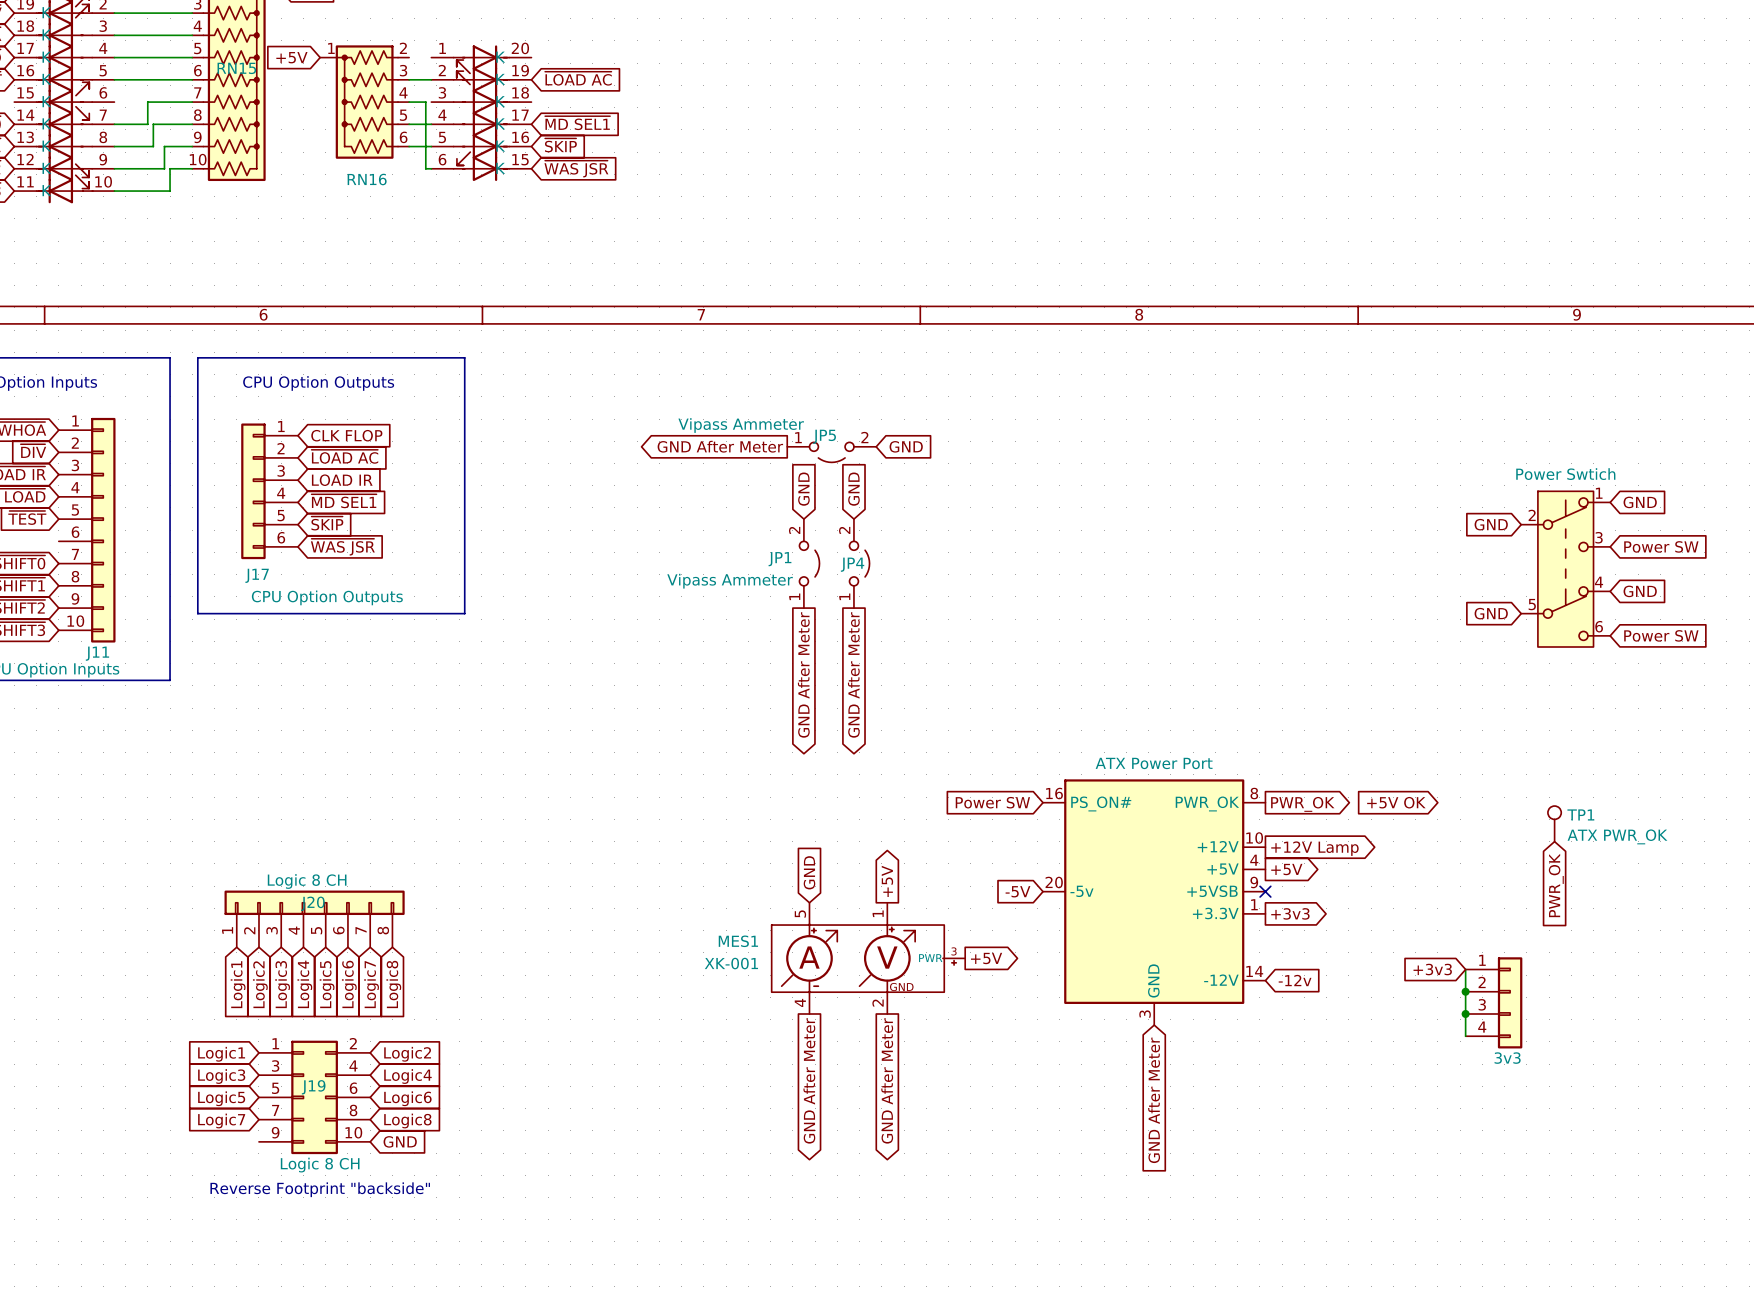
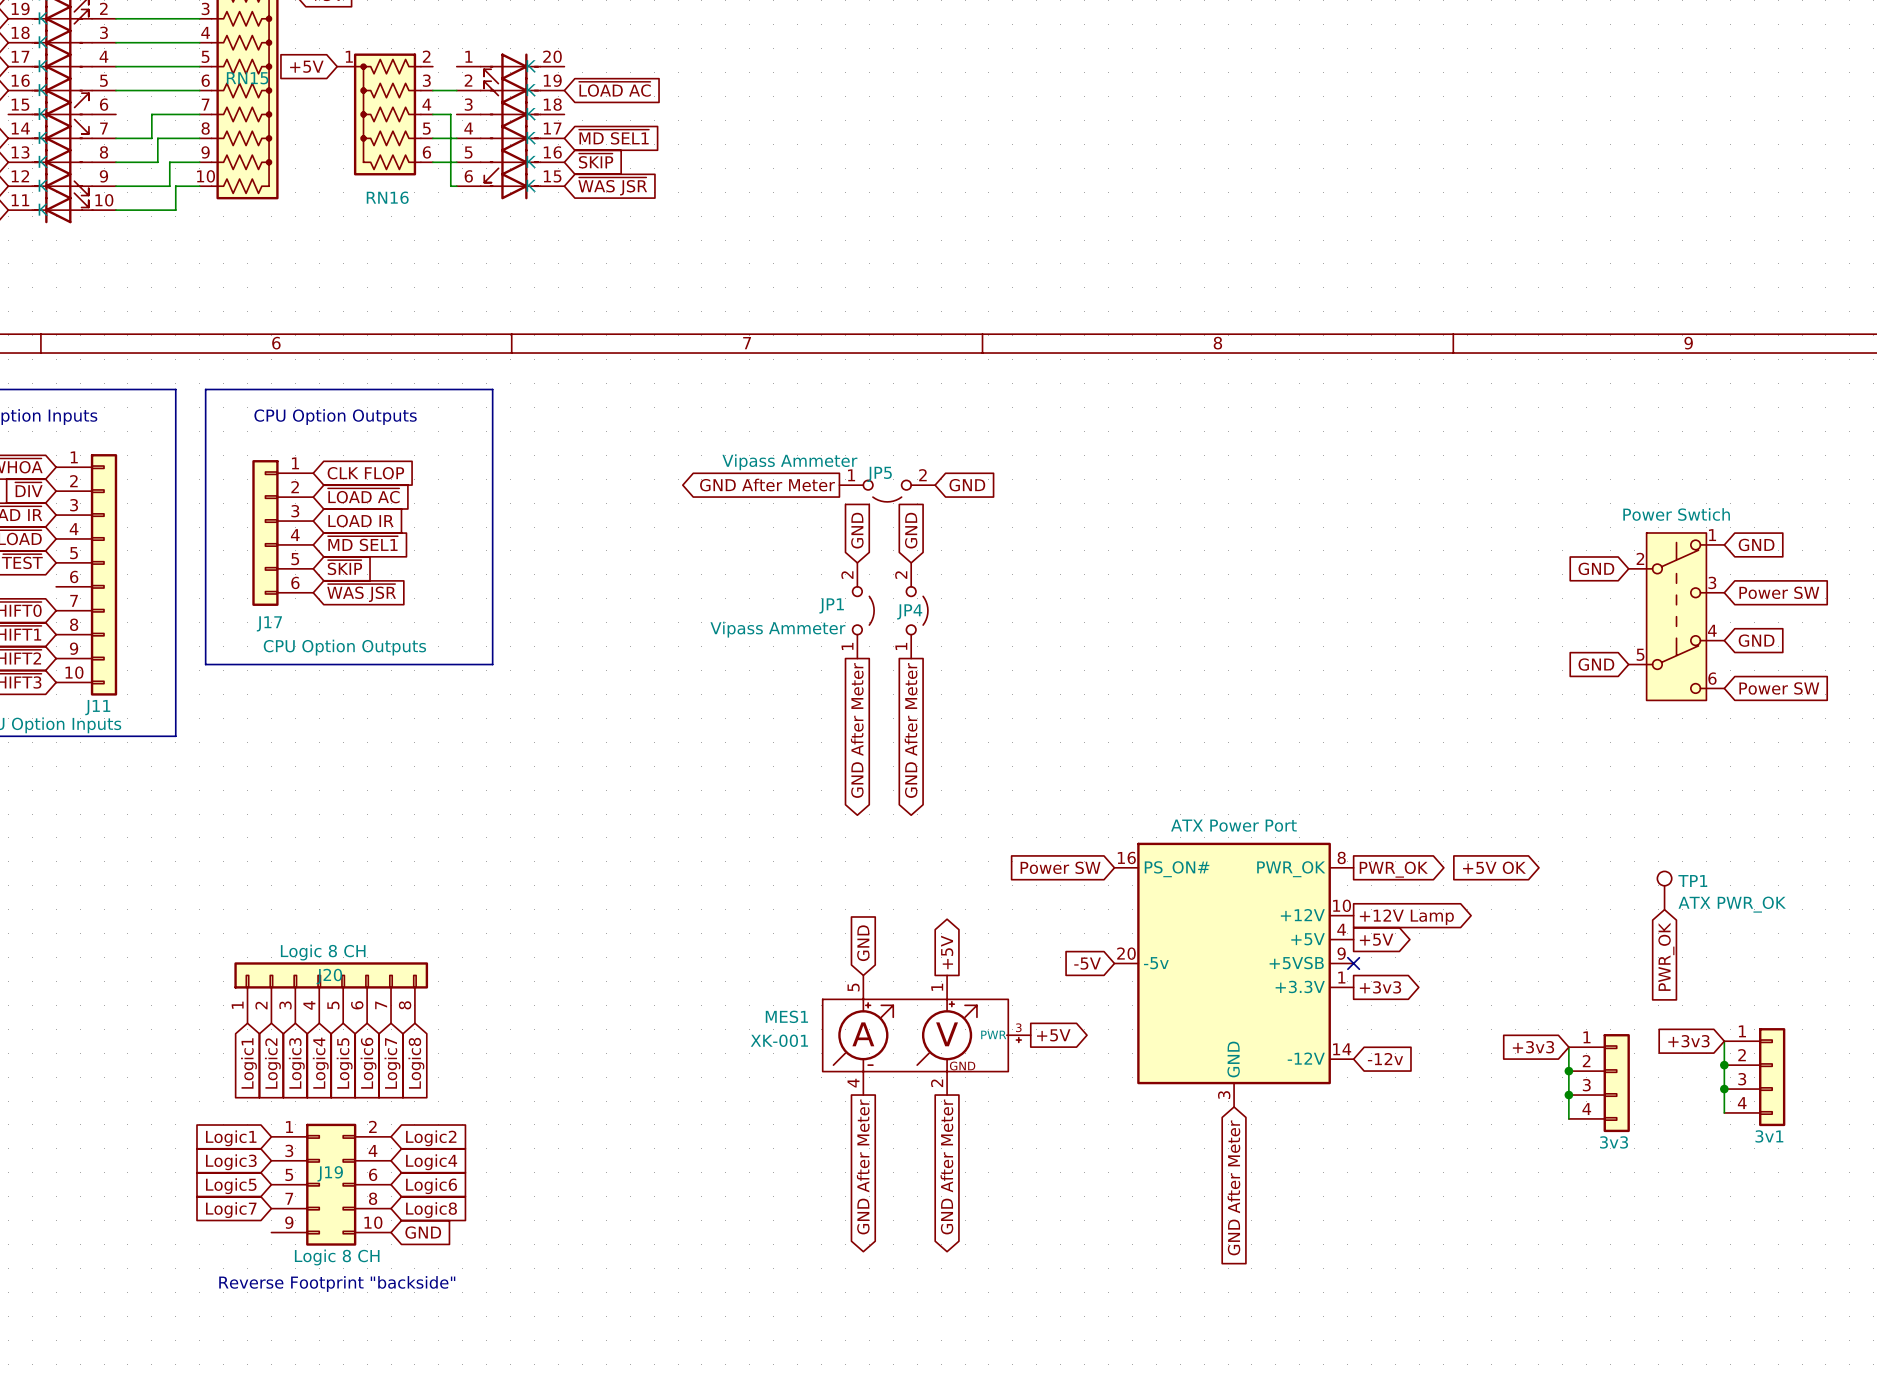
global label: none -> +3v3 (1688, 1041)
wire: none -> (1724, 1041) (1724, 1112)
junction: none -> (1724, 1065)
3v1: none -> (1754, 1077)
junction: none -> (1724, 1089)

